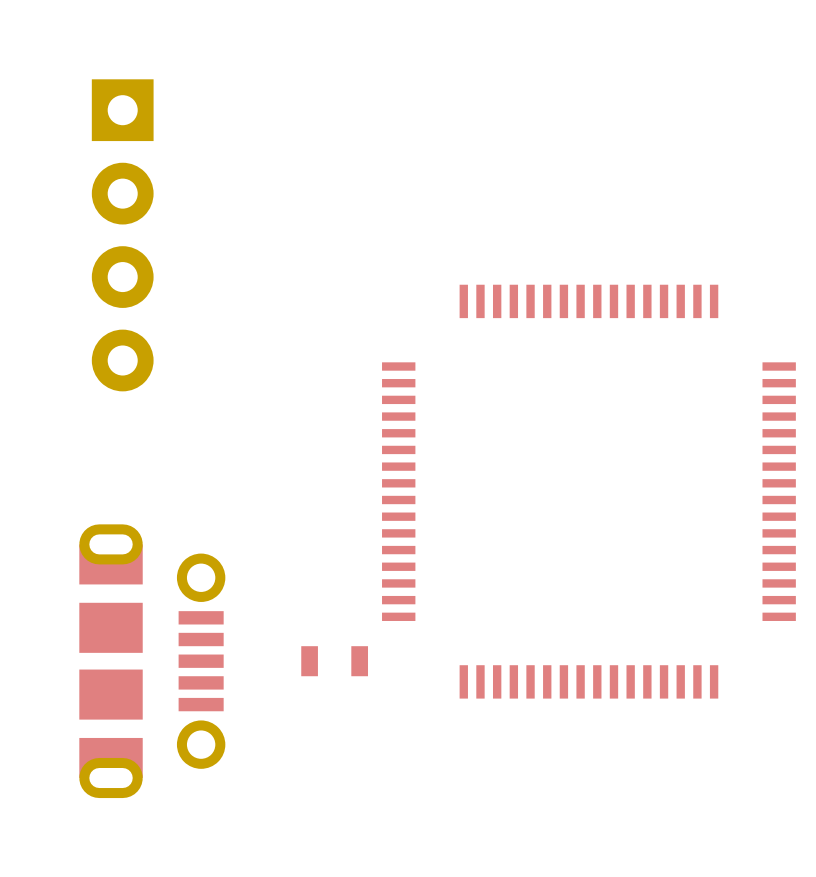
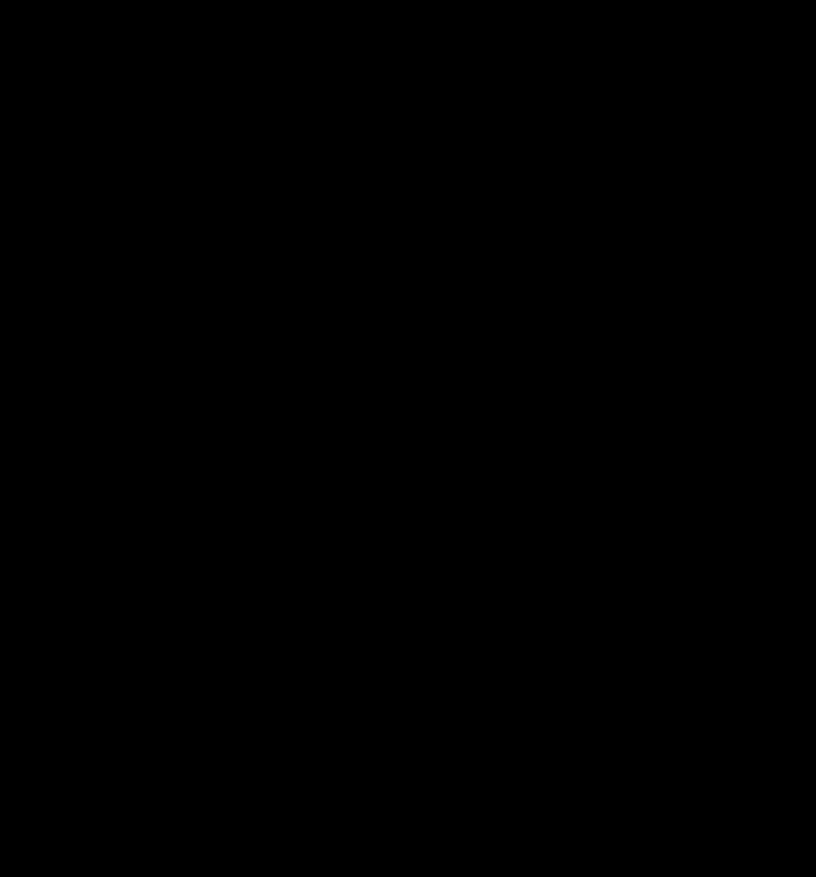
part: (122, 235) -> none
part: (588, 491) -> none
part: (152, 661) -> none
part: (334, 661) -> none

